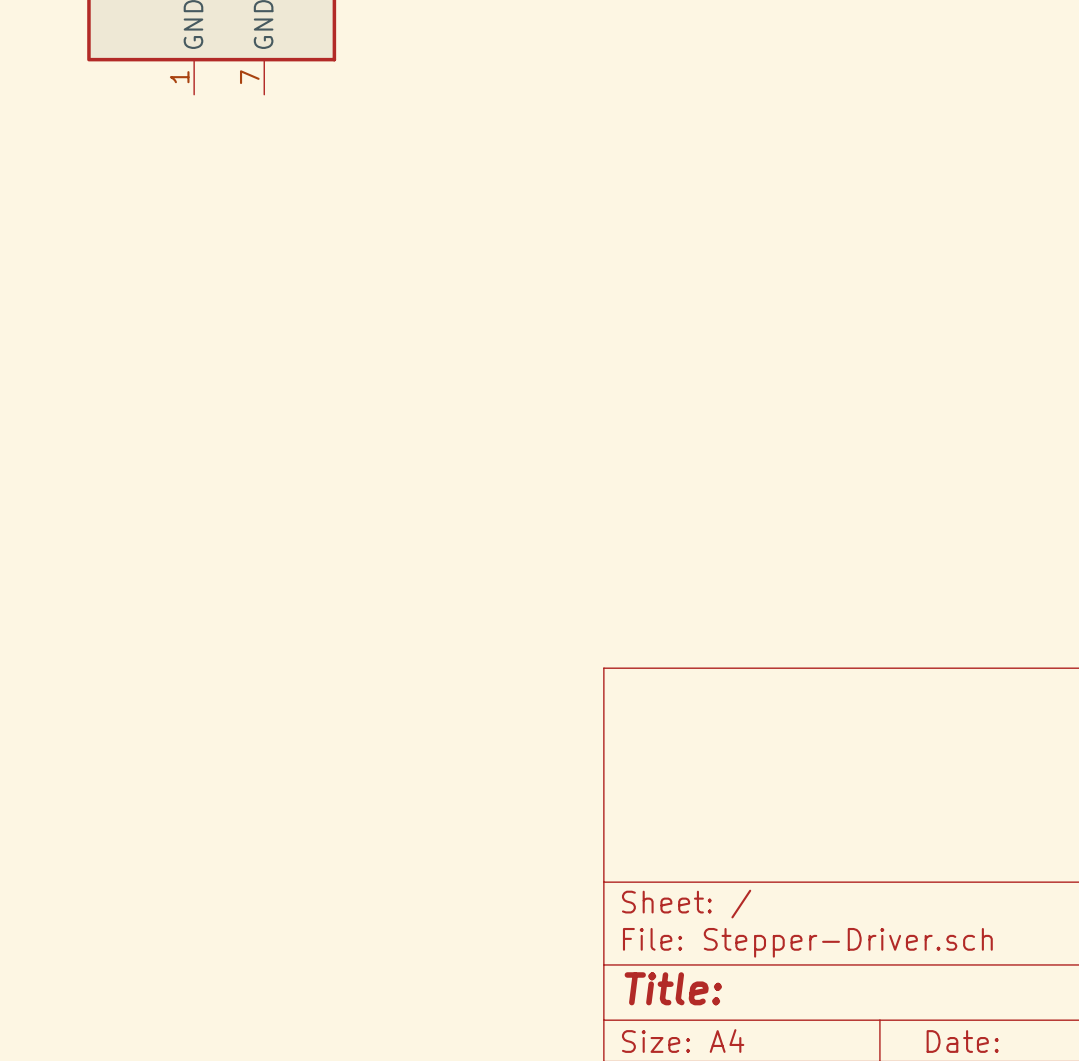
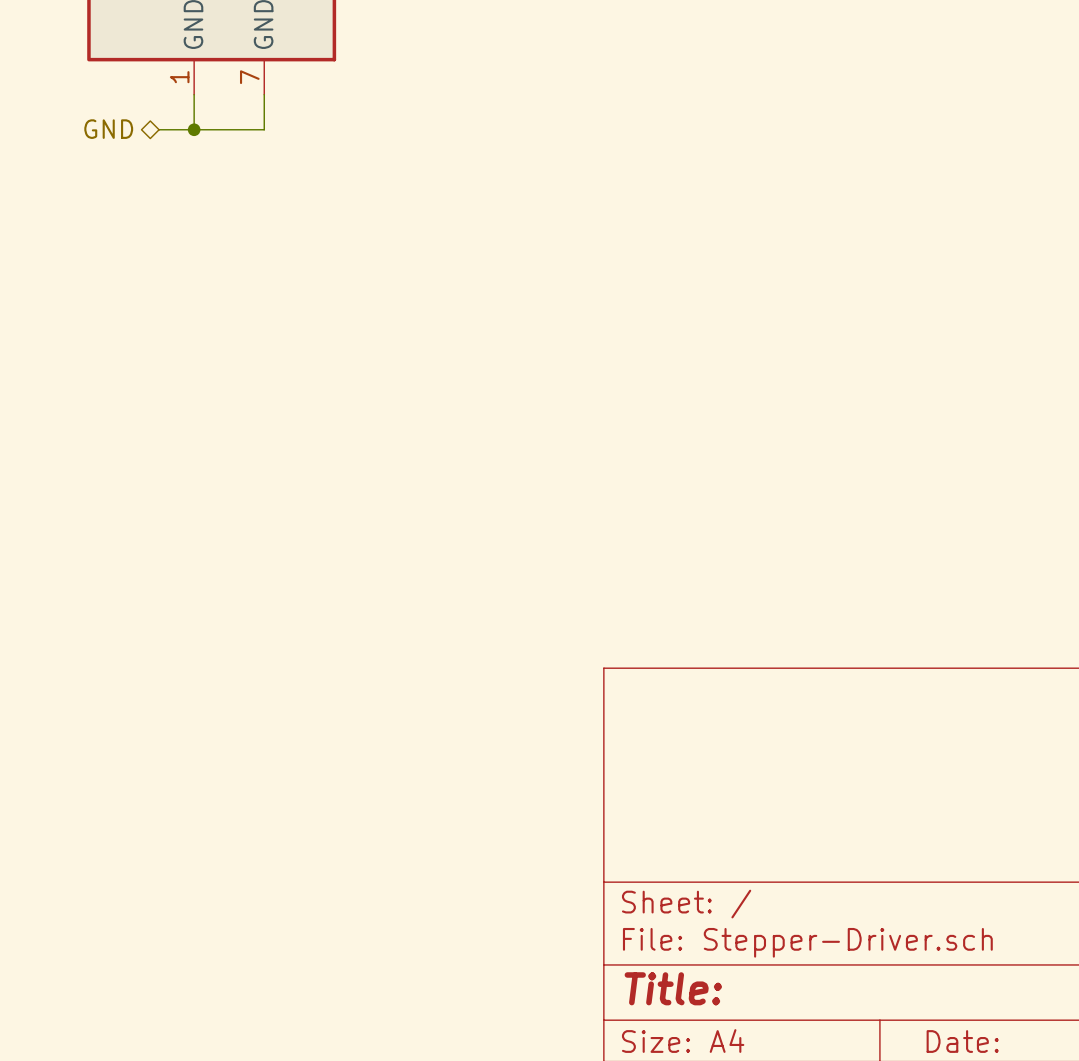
wire: none -> (194, 94) (194, 129)
wire: none -> (264, 94) (264, 129) (159, 129)
hierarchical label: none -> GND (108, 129)
junction: none -> (194, 129)

